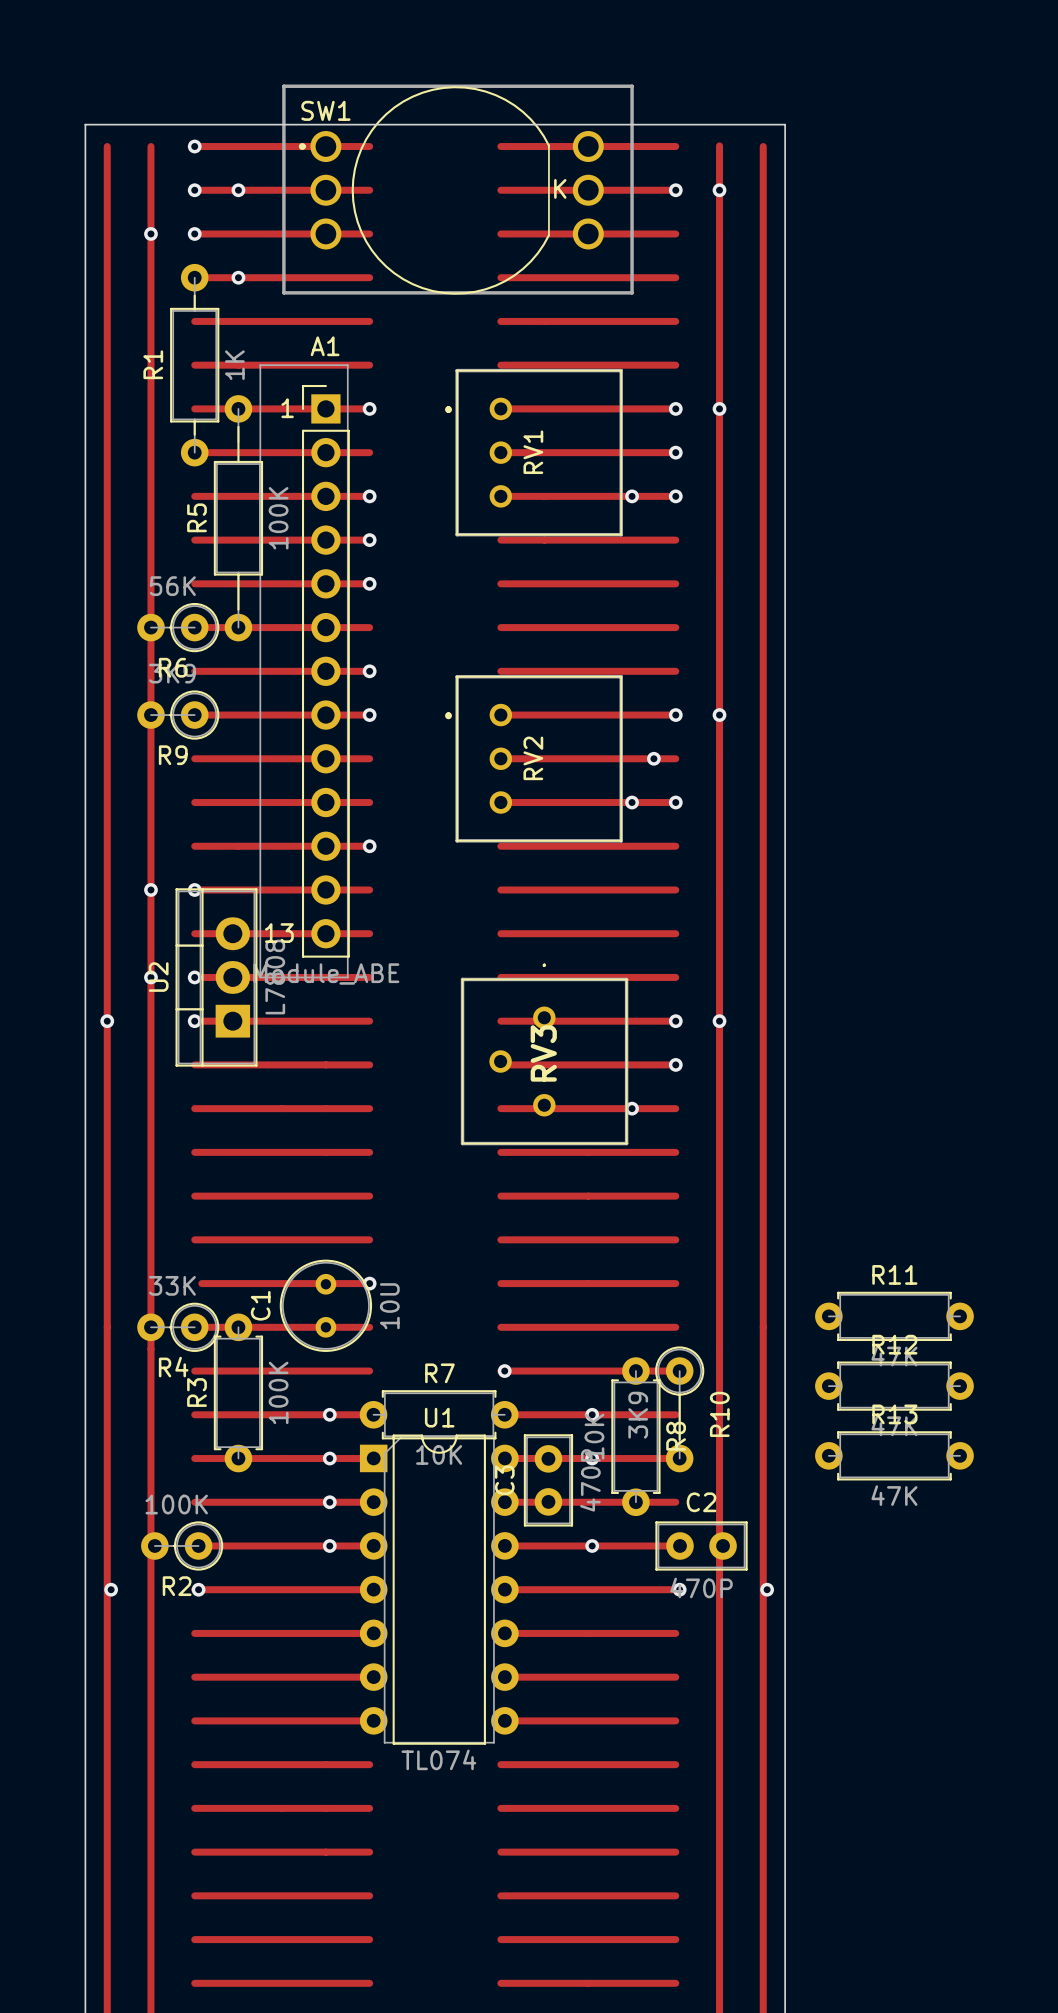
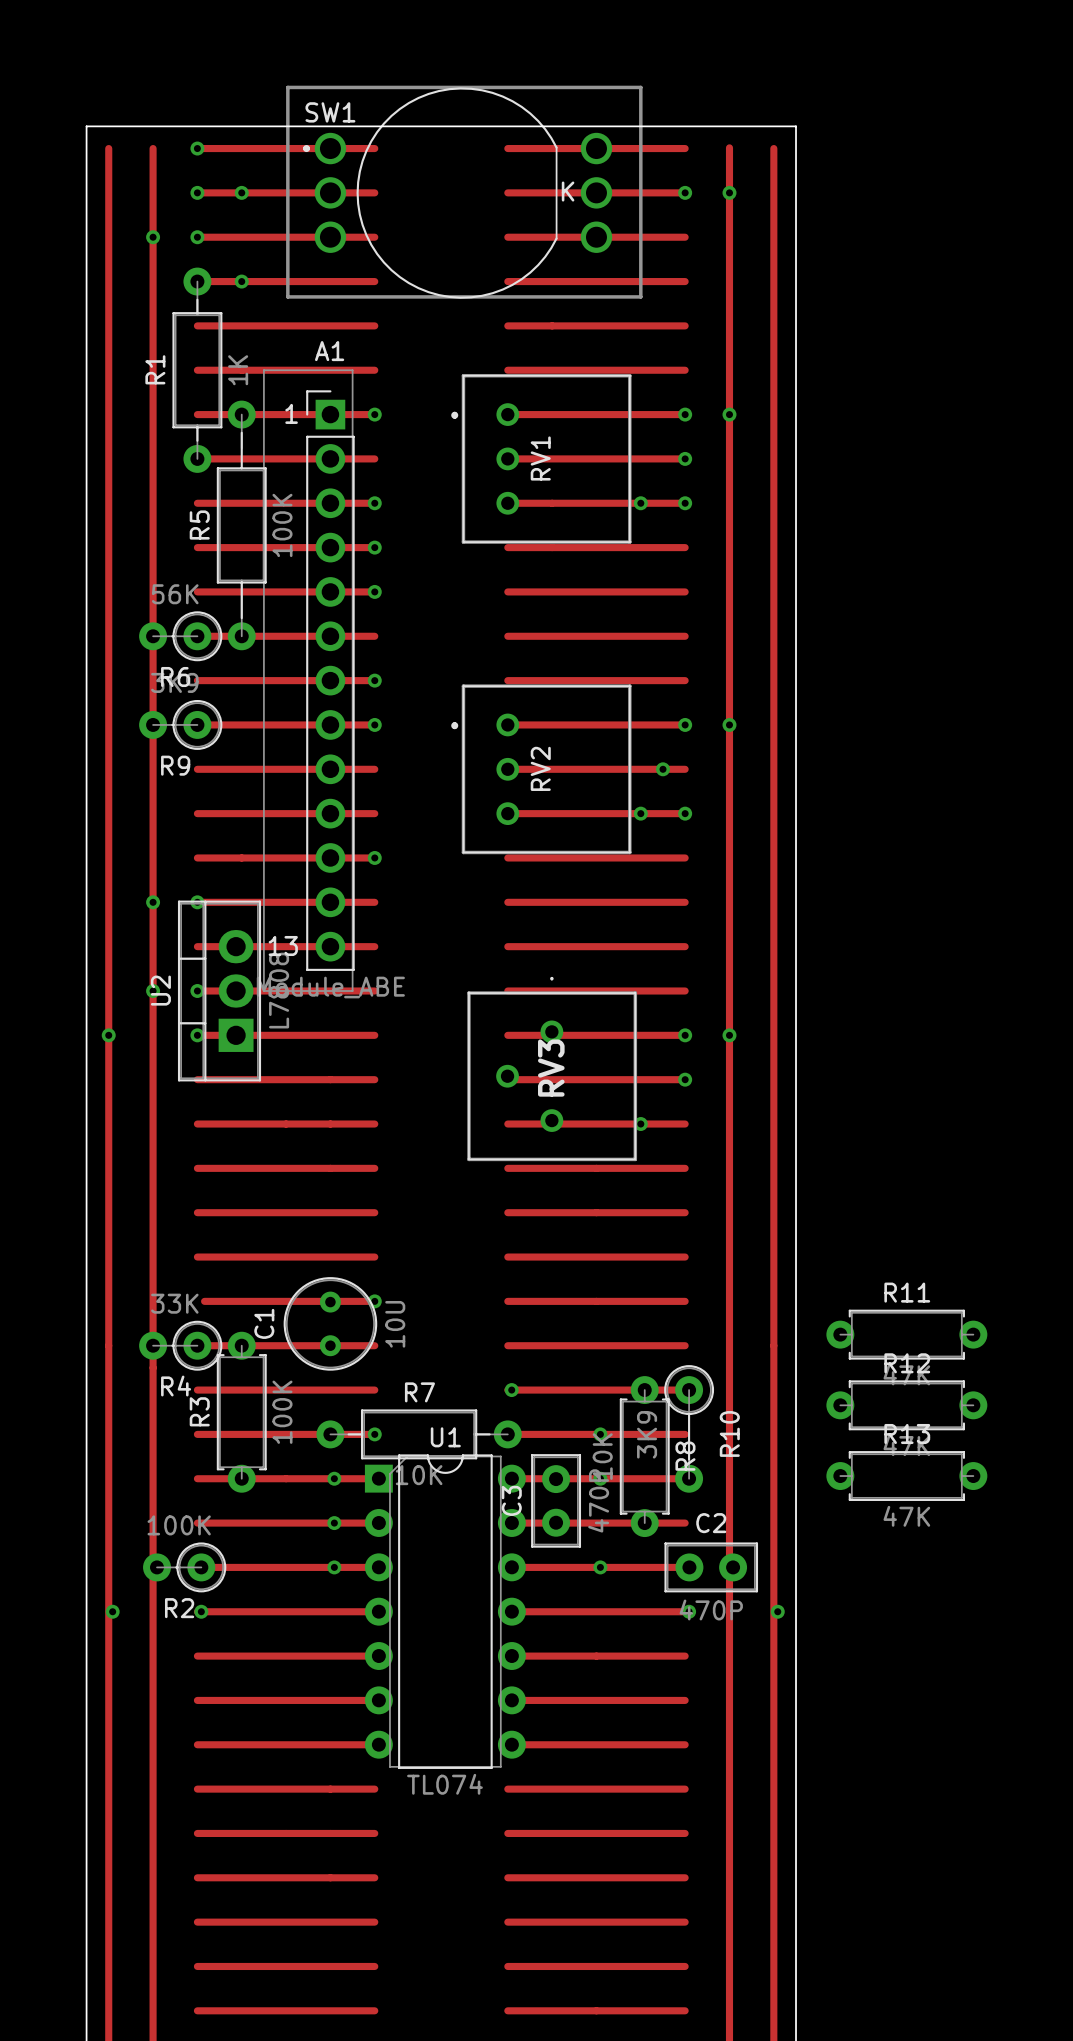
R7 footprint: [359, 1390, 519, 1440] -> [316, 1409, 522, 1460]
via position: (329, 1414) -> (374, 1434)

